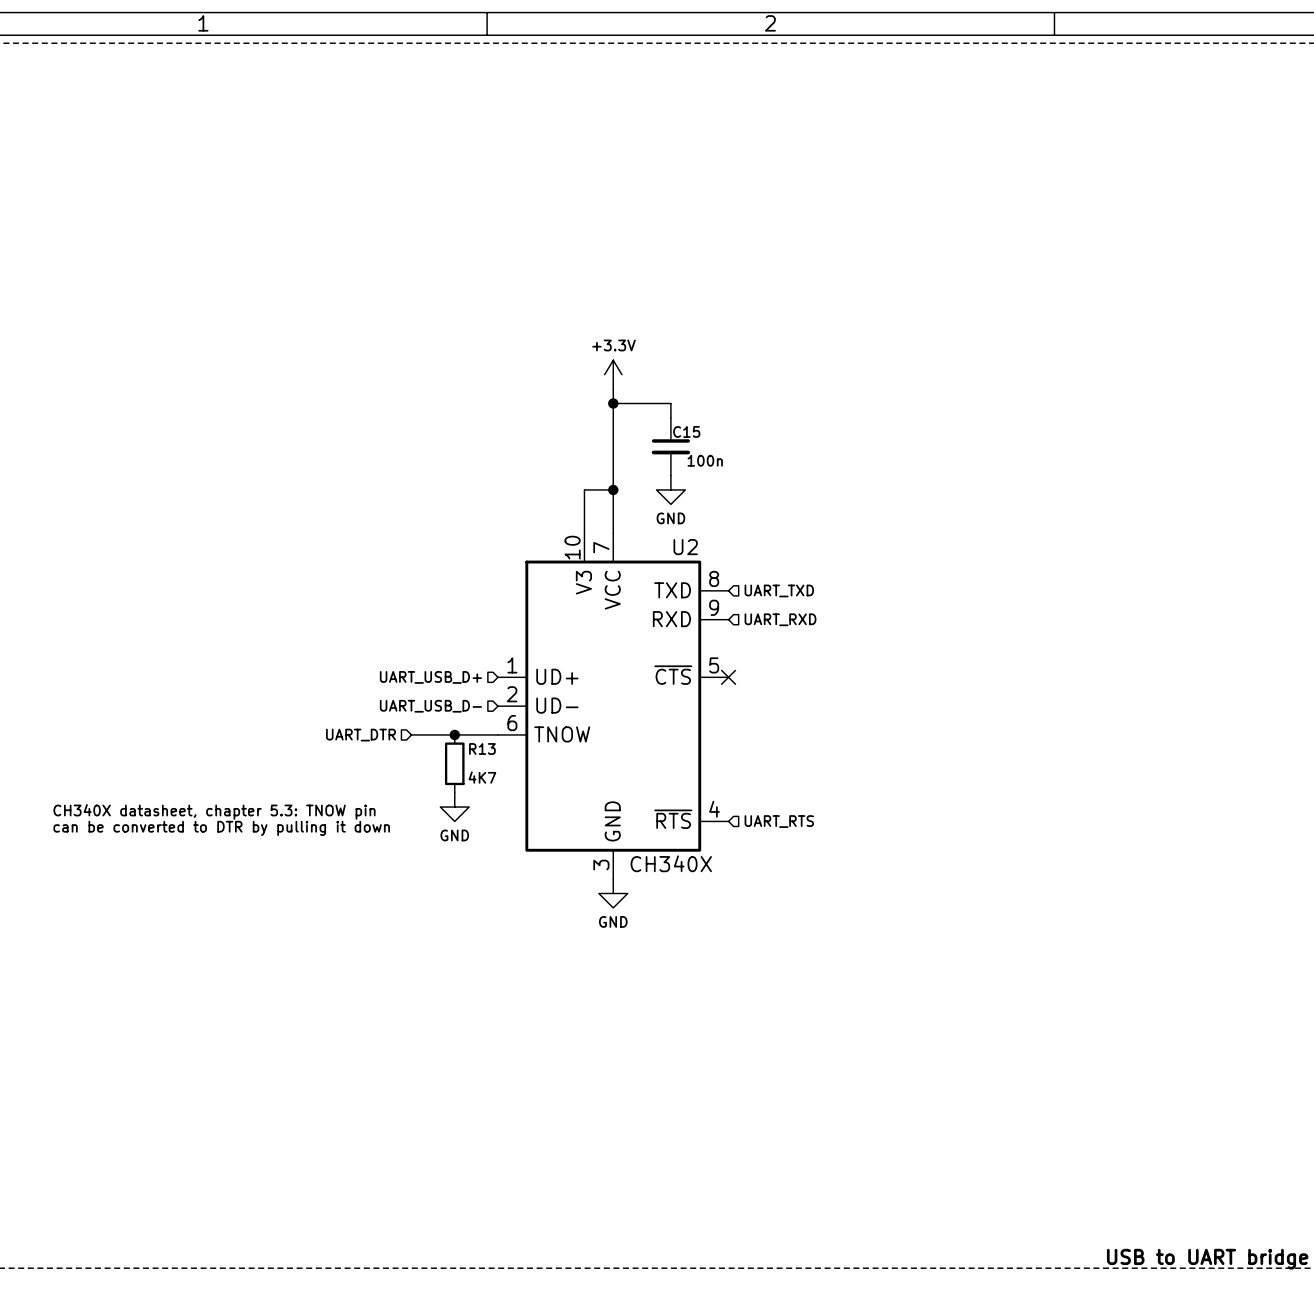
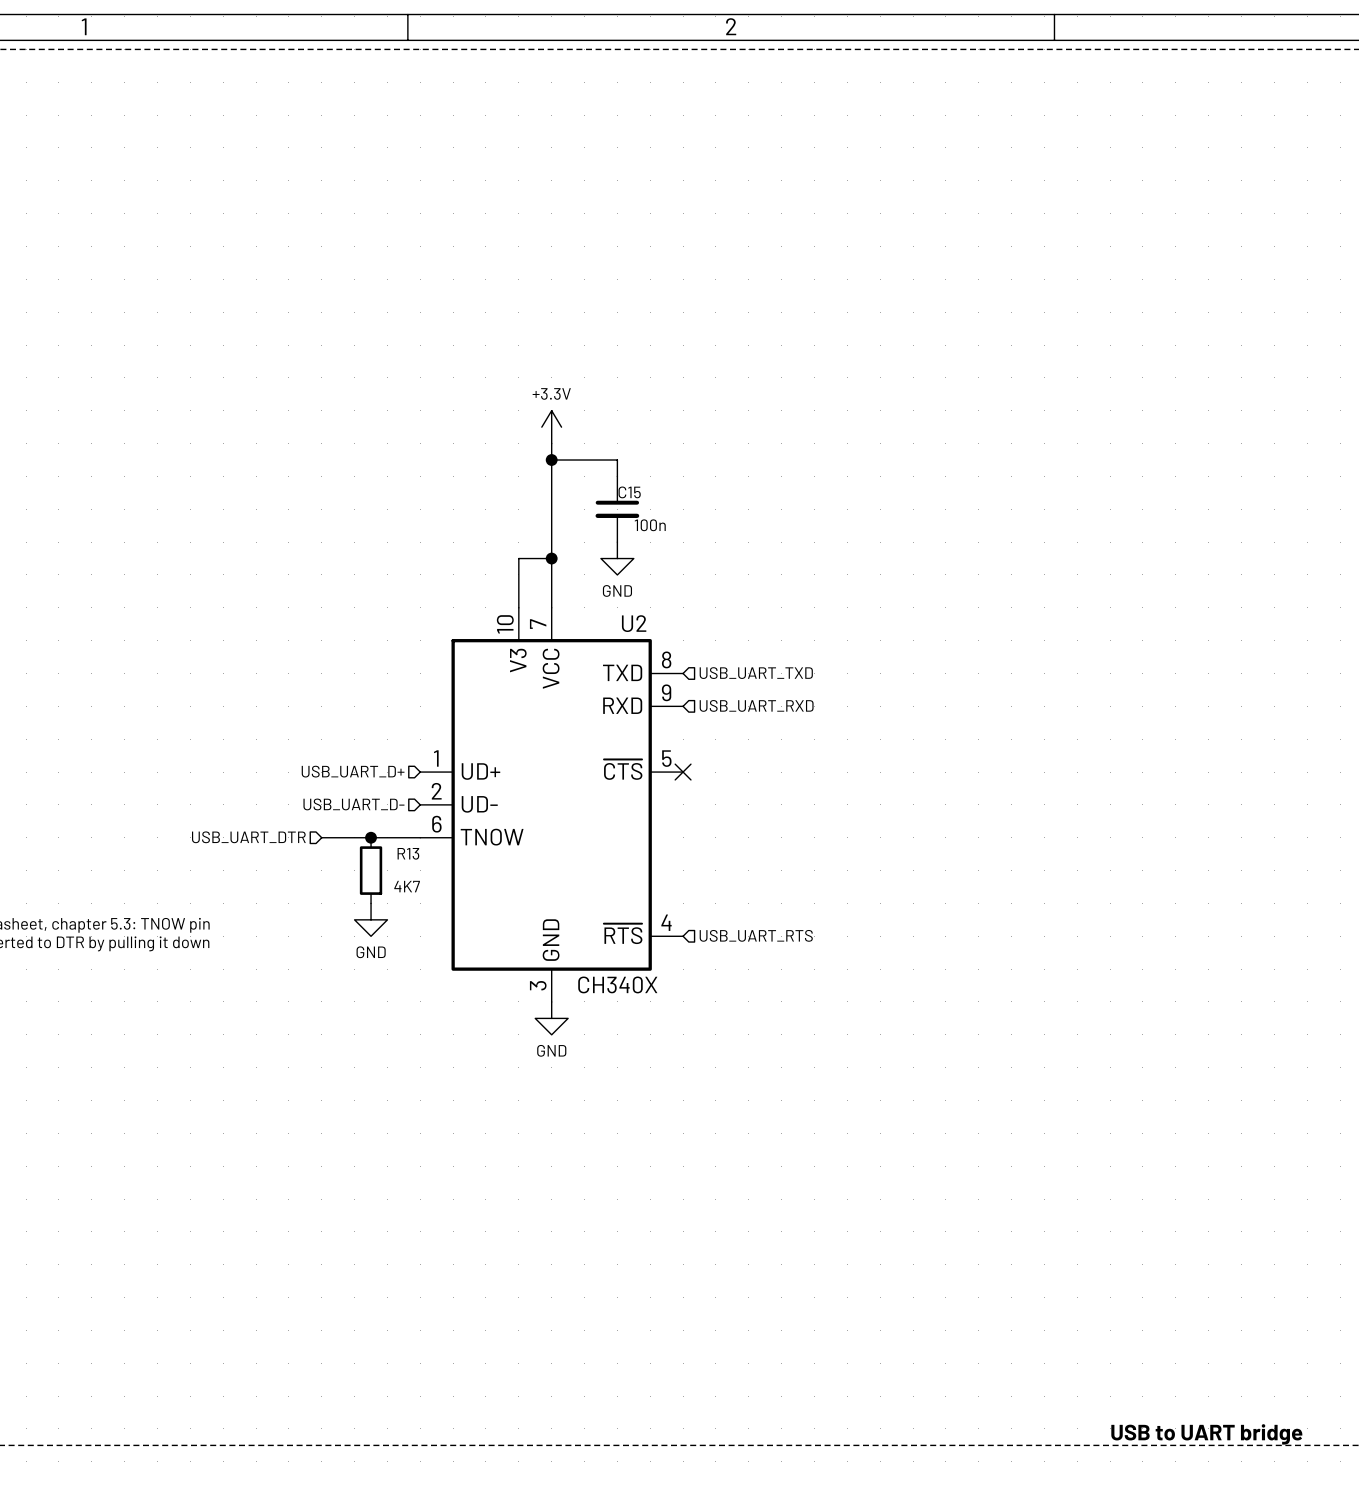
hierarchical label: UART_TXD (779, 590) -> USB_UART_TXD (756, 673)
hierarchical label: UART_RXD (780, 619) -> USB_UART_RXD (756, 705)
hierarchical label: UART_USB_D+ (430, 677) -> USB_UART_D+ (353, 771)
hierarchical label: UART_USB_D- (430, 706) -> USB_UART_D- (353, 804)
hierarchical label: UART_DTR (361, 735) -> USB_UART_DTR (248, 837)
hierarchical label: UART_RTS (779, 821) -> USB_UART_RTS (756, 935)

